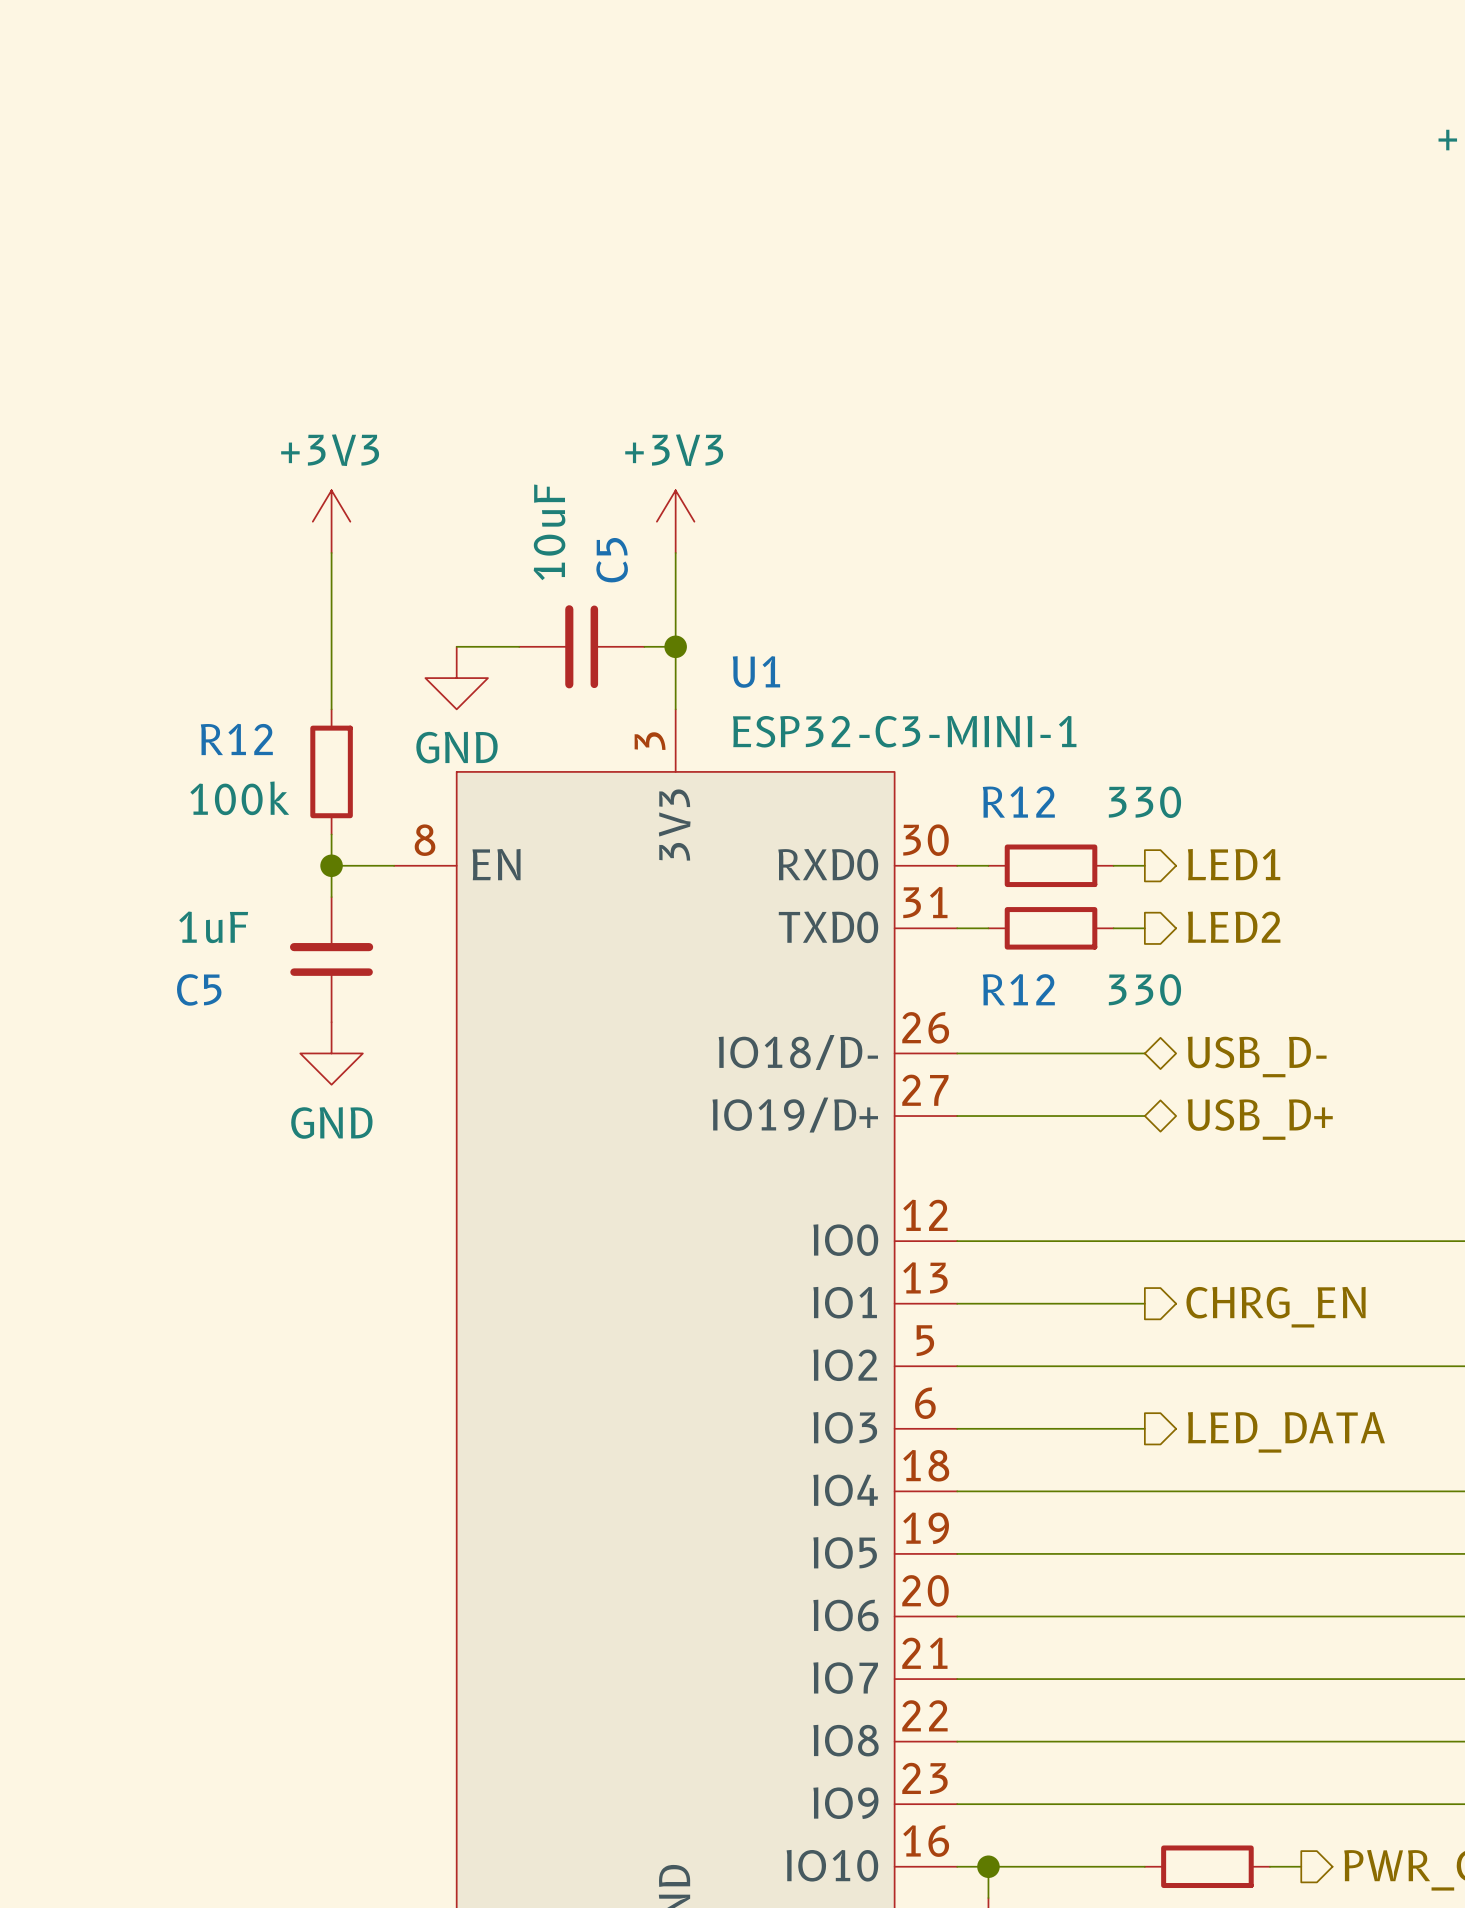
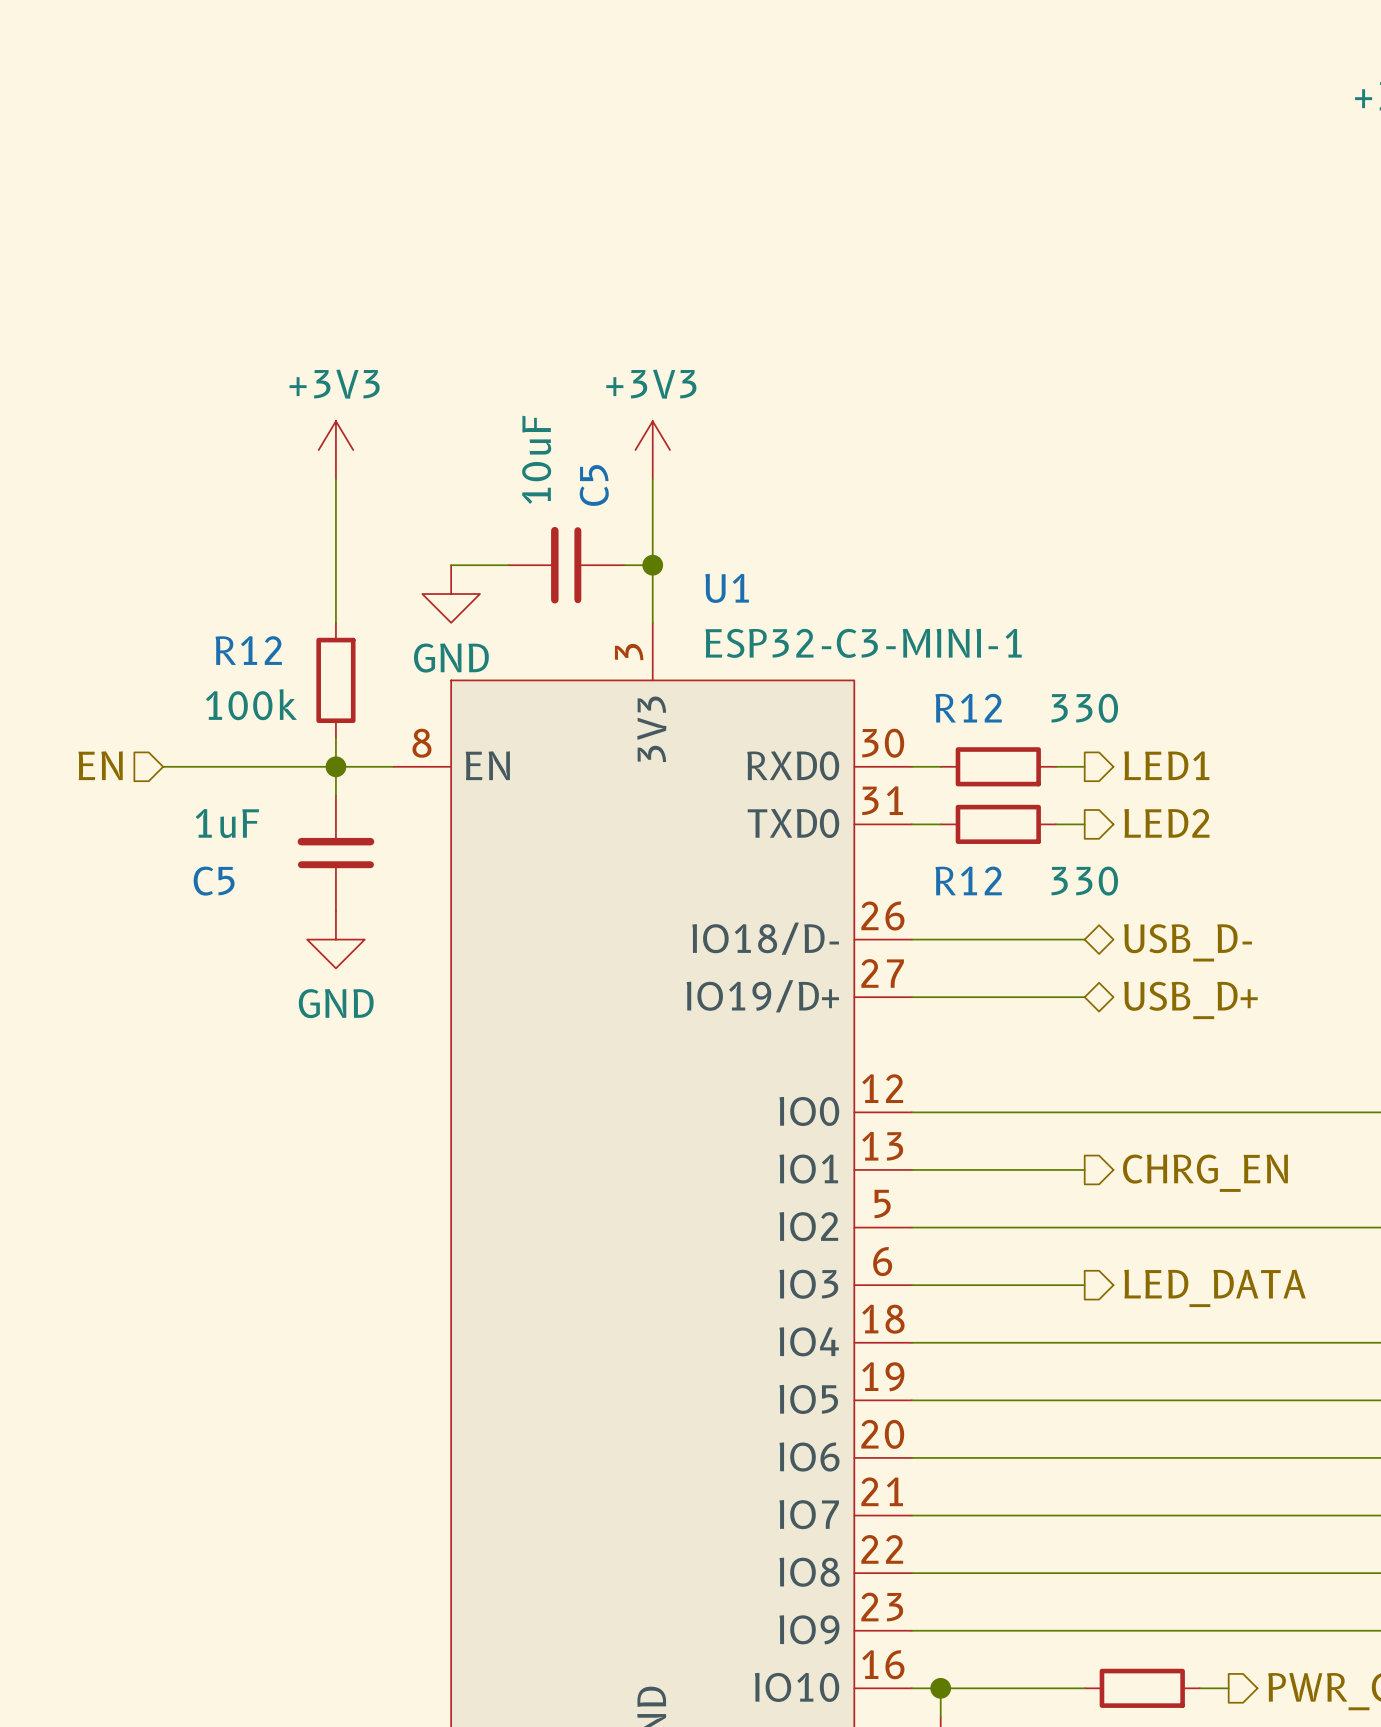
hierarchical label: none -> EN (100, 765)
wire: none -> (163, 766) (335, 766)

